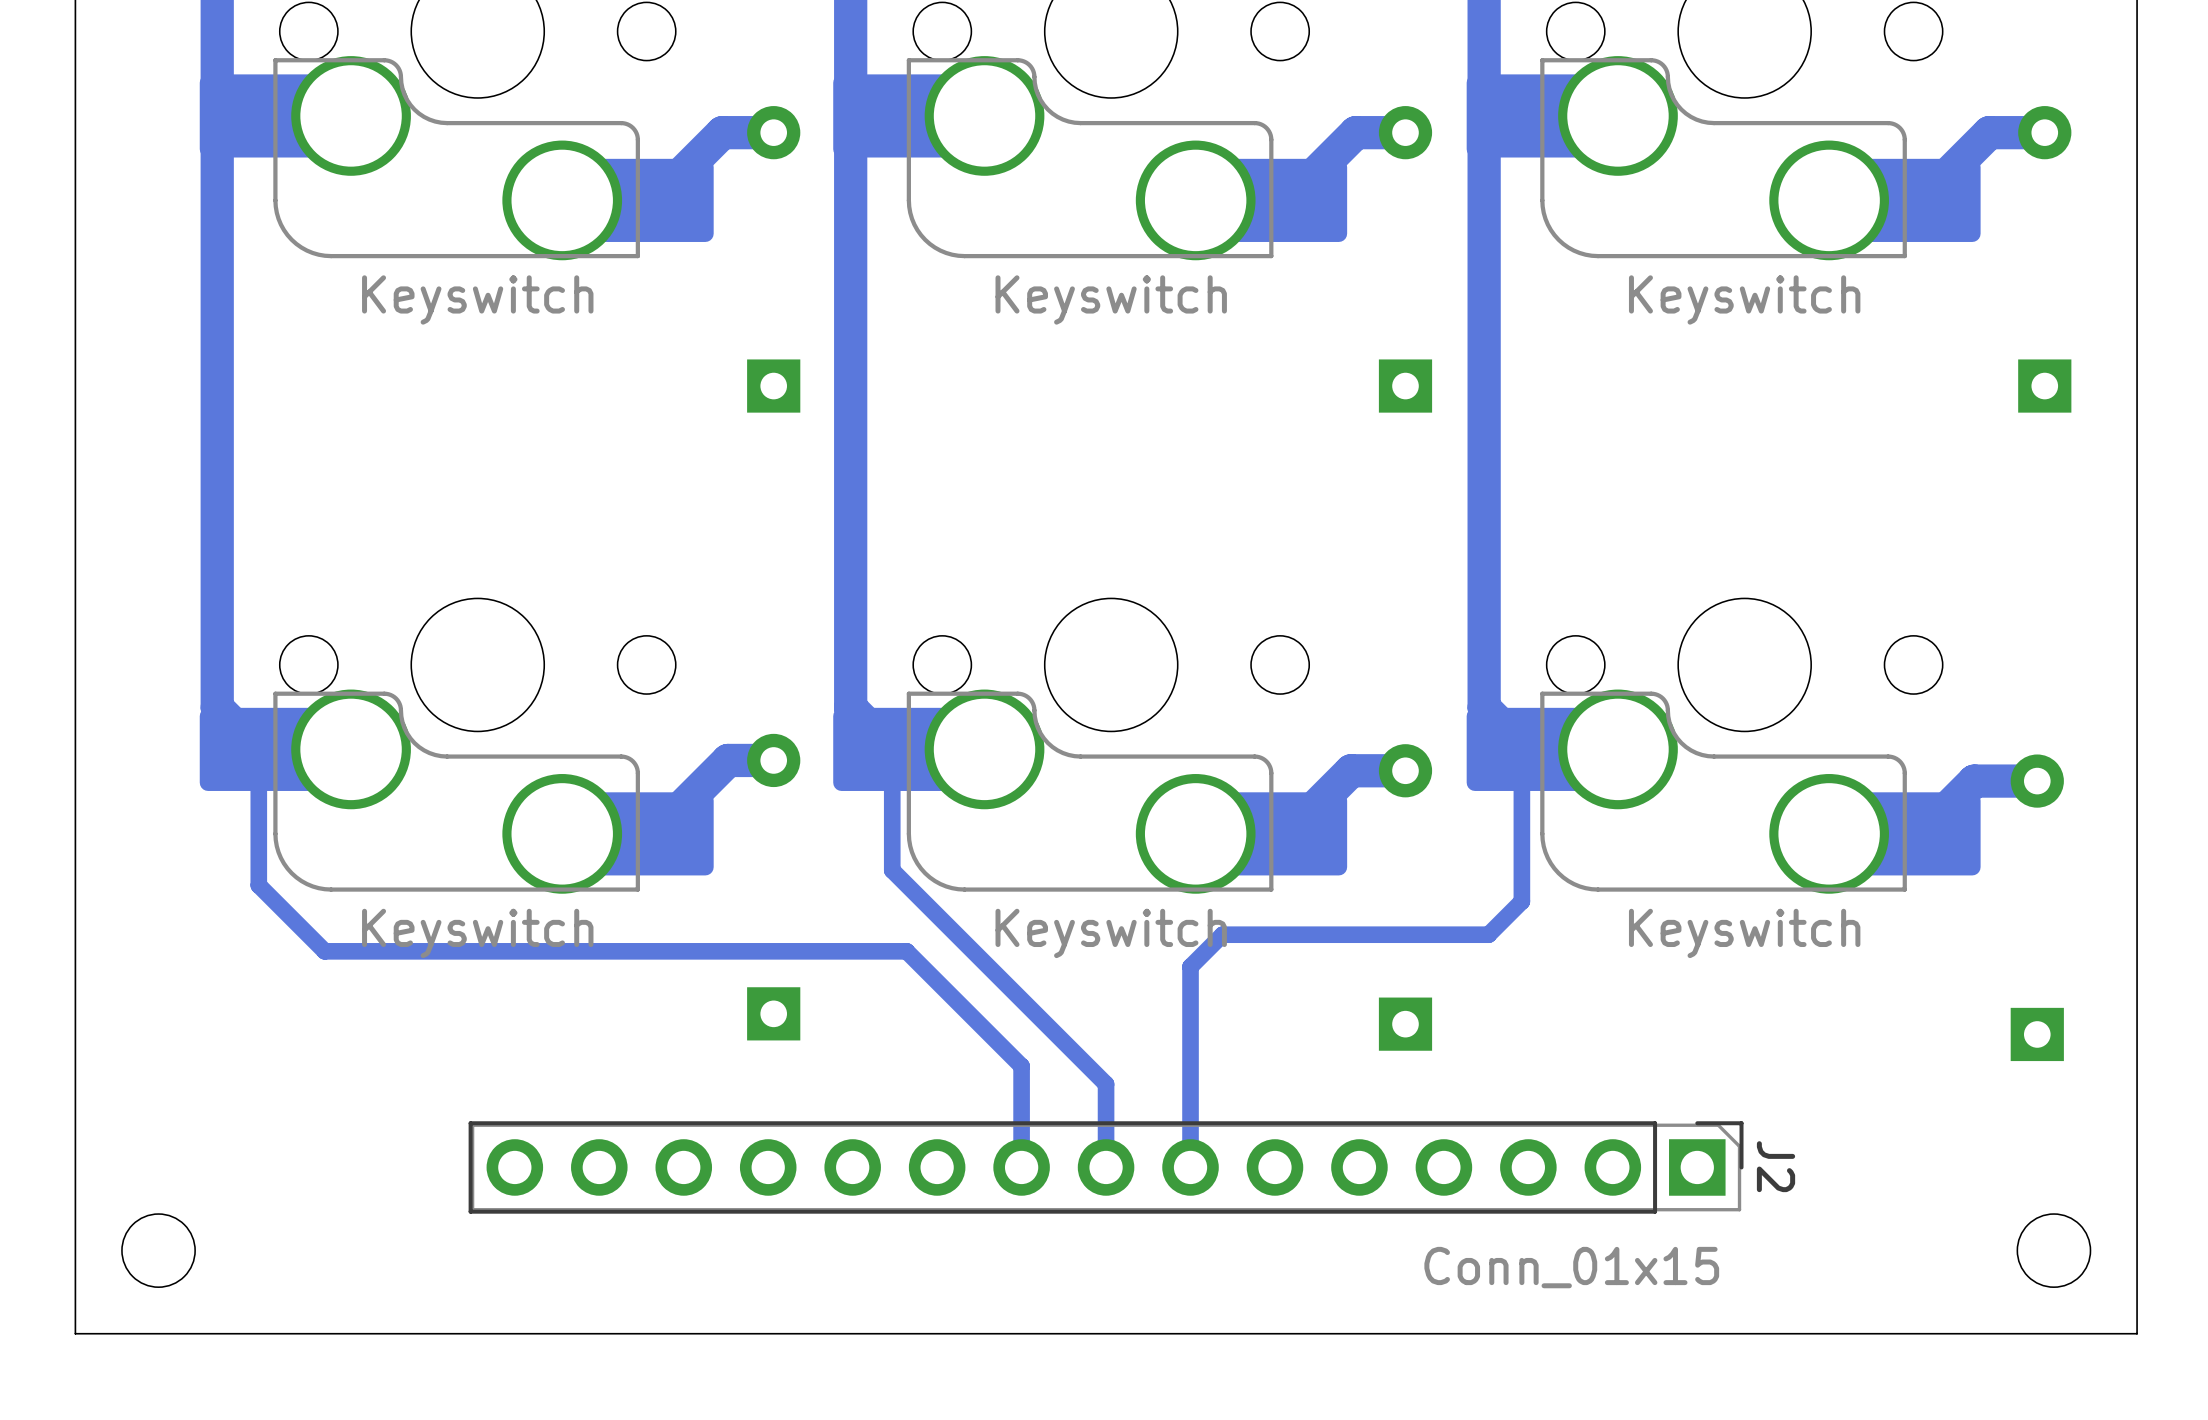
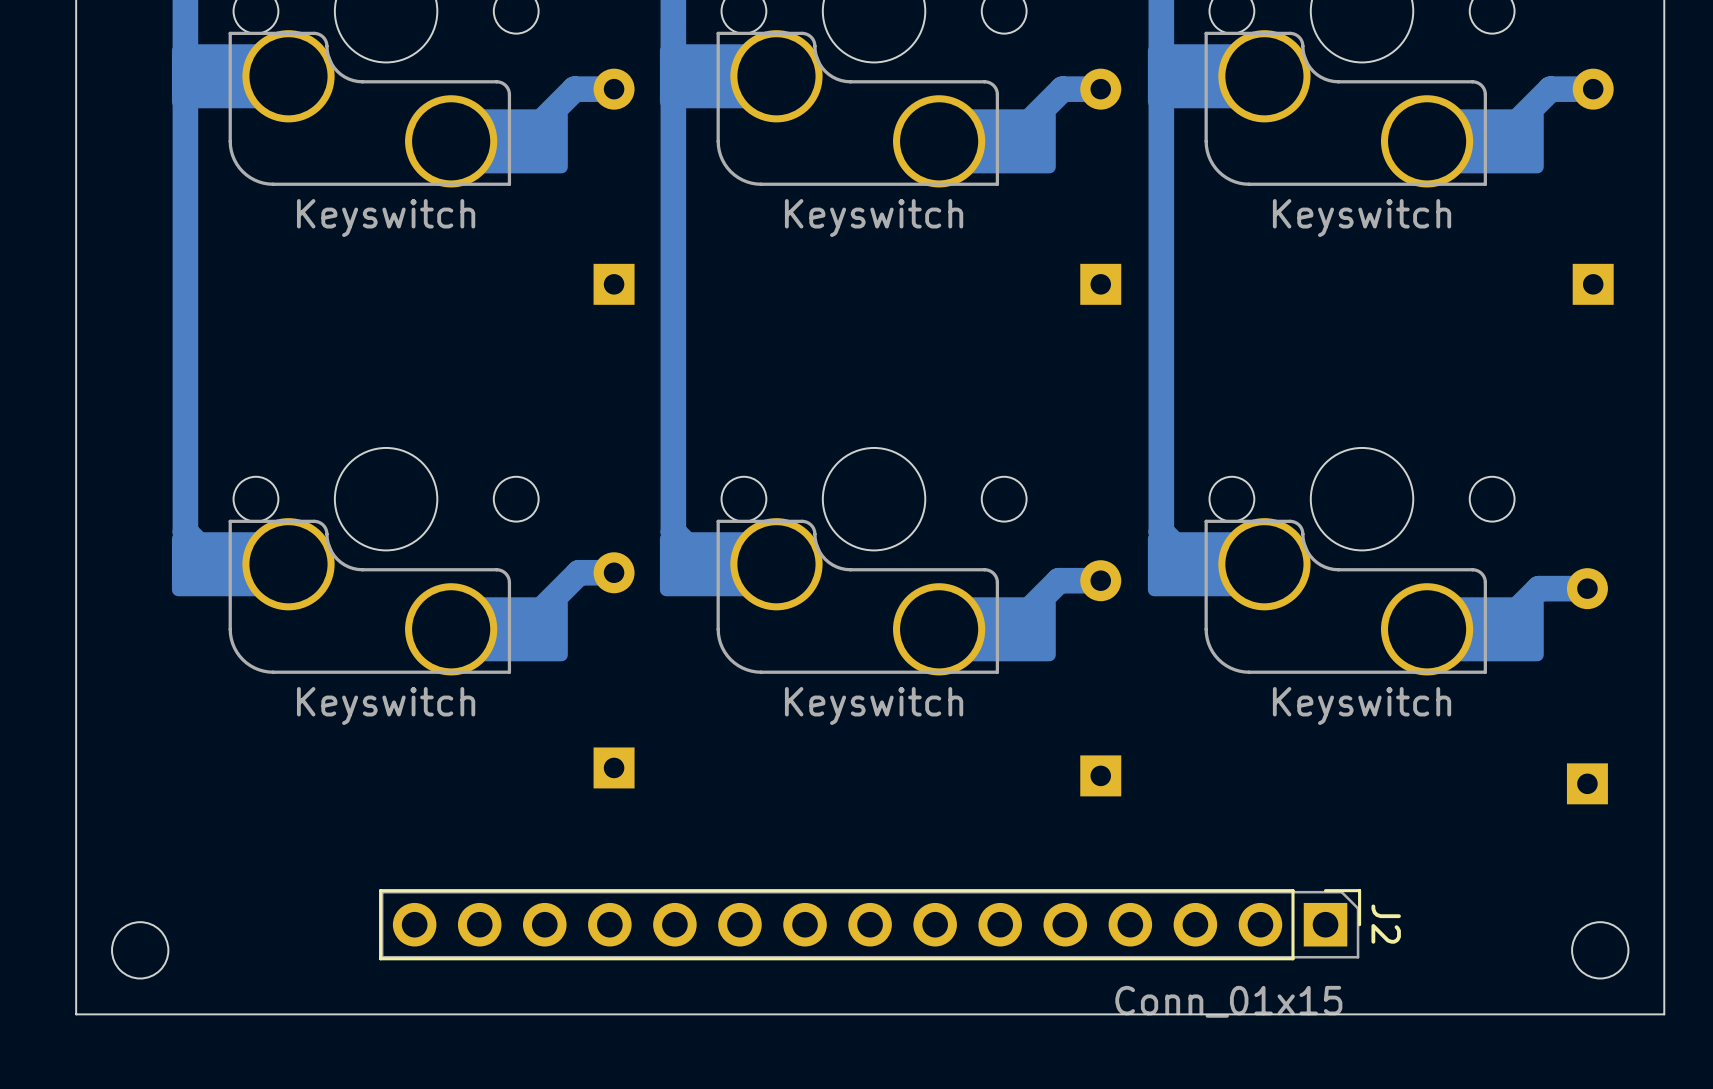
track: (258, 749) (258, 885) (324, 951) (906, 951) (1021, 1066) (1021, 1167) -> none
track: (892, 749) (892, 870) (1106, 1084) (1106, 1167) -> none
track: (1521, 753) (1521, 901) (1488, 934) (1222, 934) (1190, 966) (1190, 1167) -> none
J2 position: (1106, 1167) -> (870, 924)

